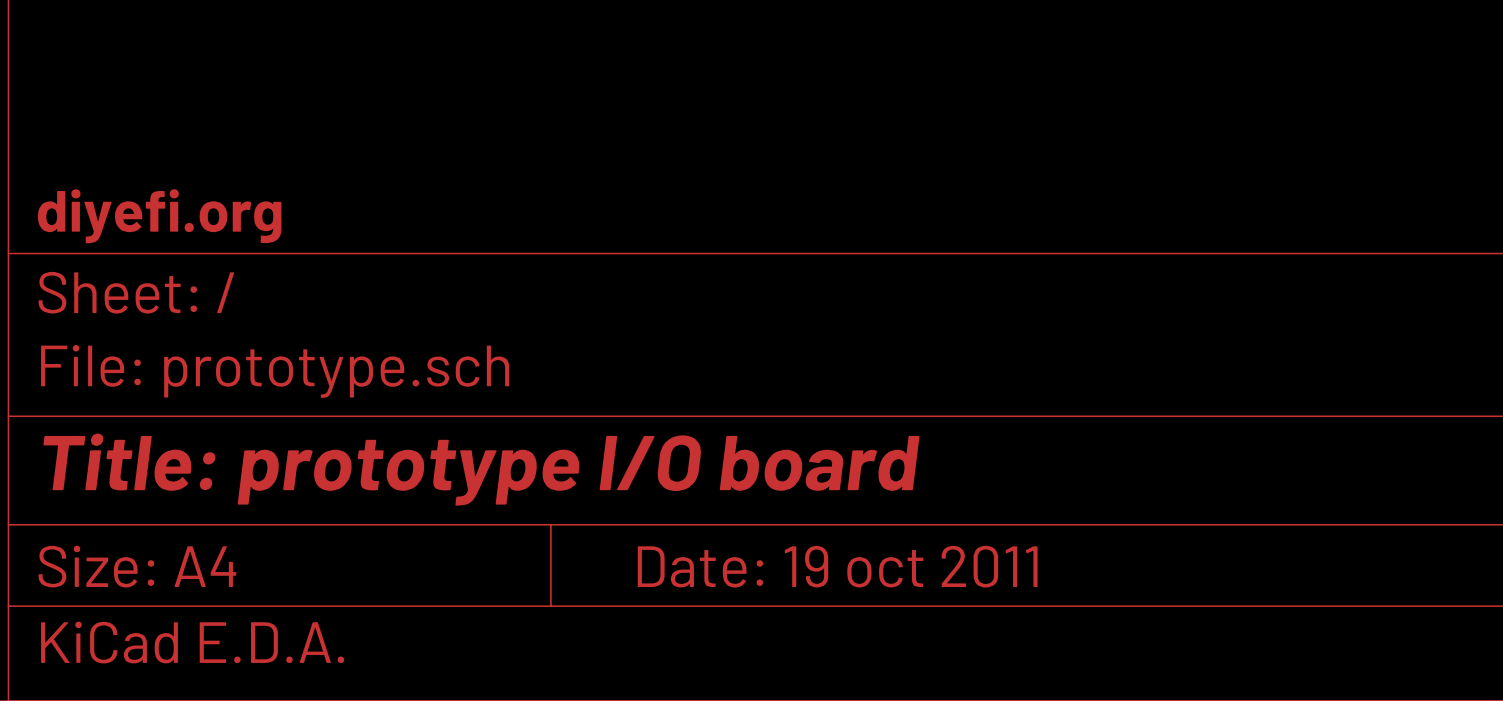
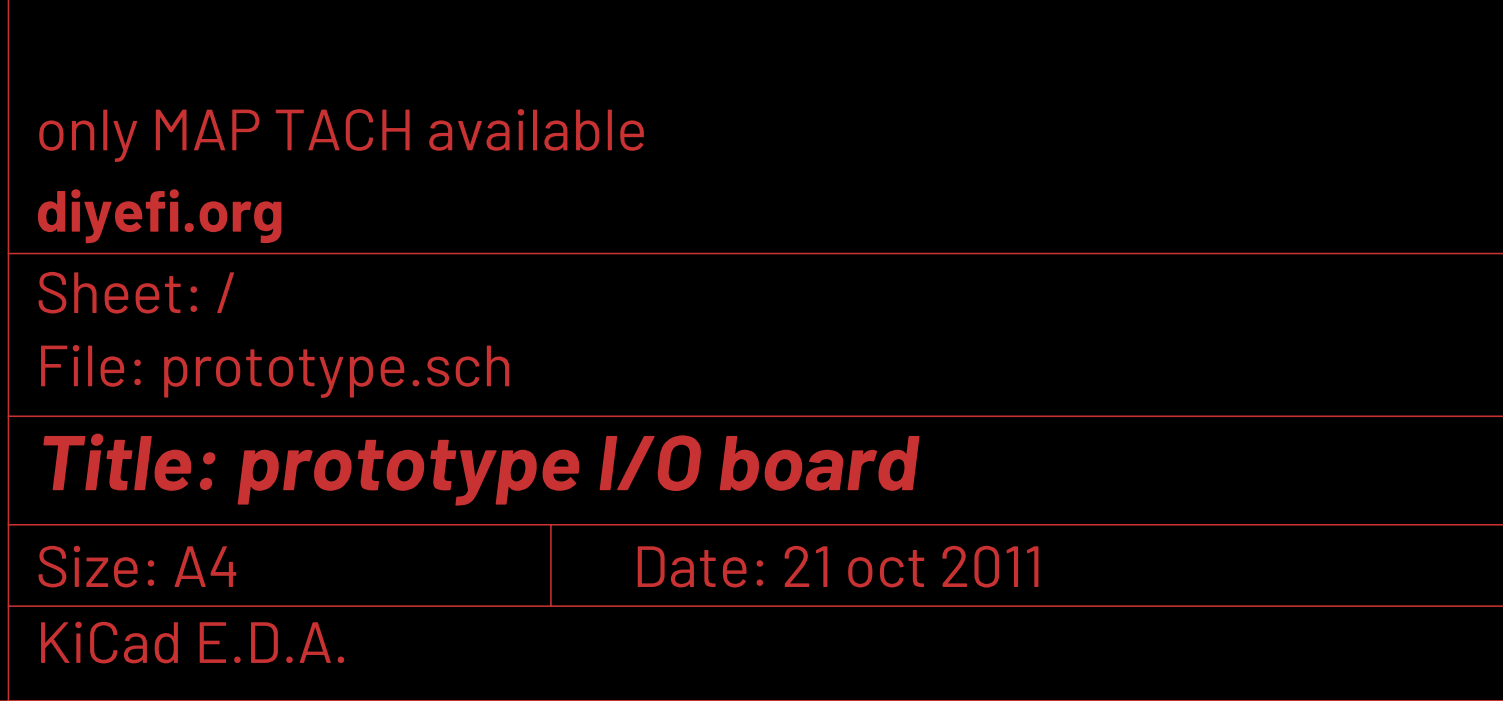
title block: none -> only MAP TACH available (341, 135)
title block: Date: 19 oct 2011 (837, 566) -> Date: 21 oct 2011 (838, 566)

